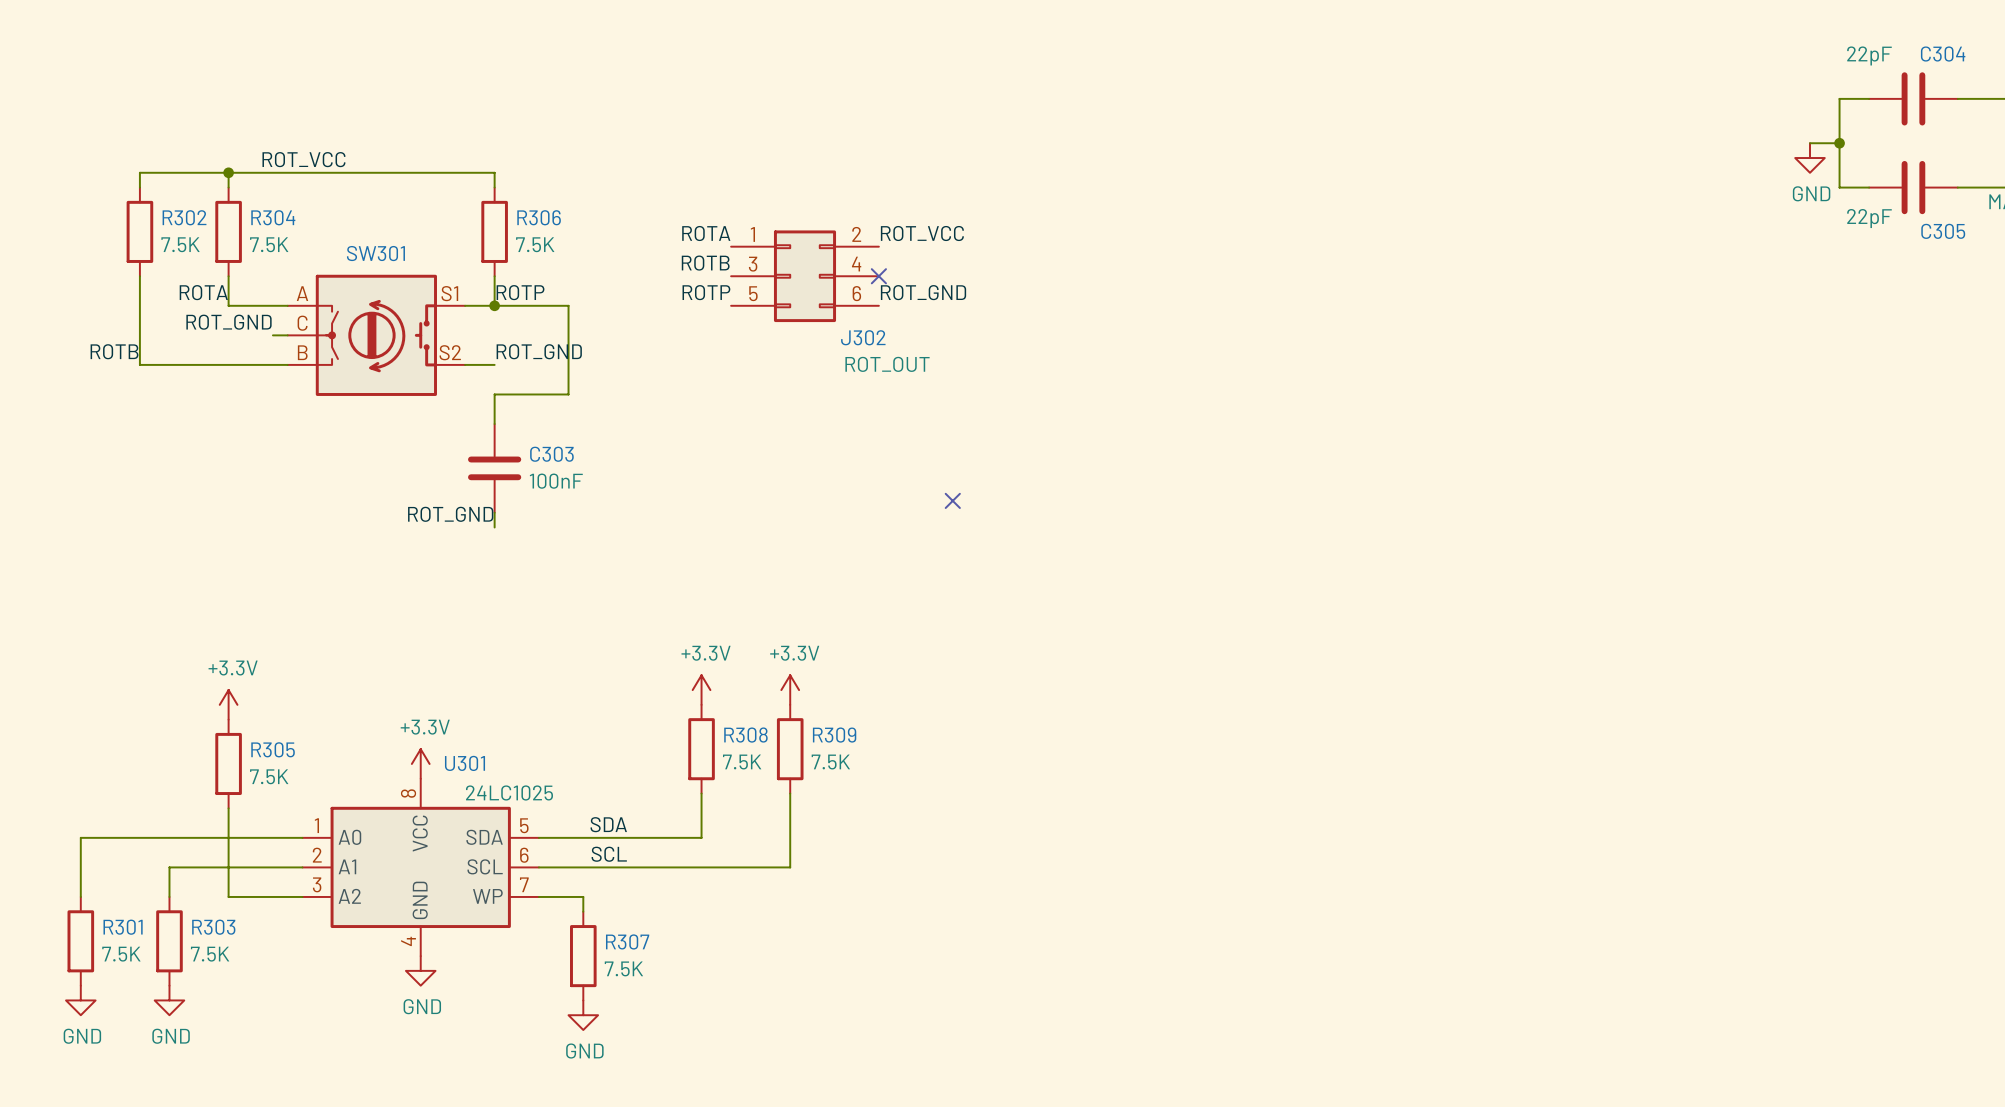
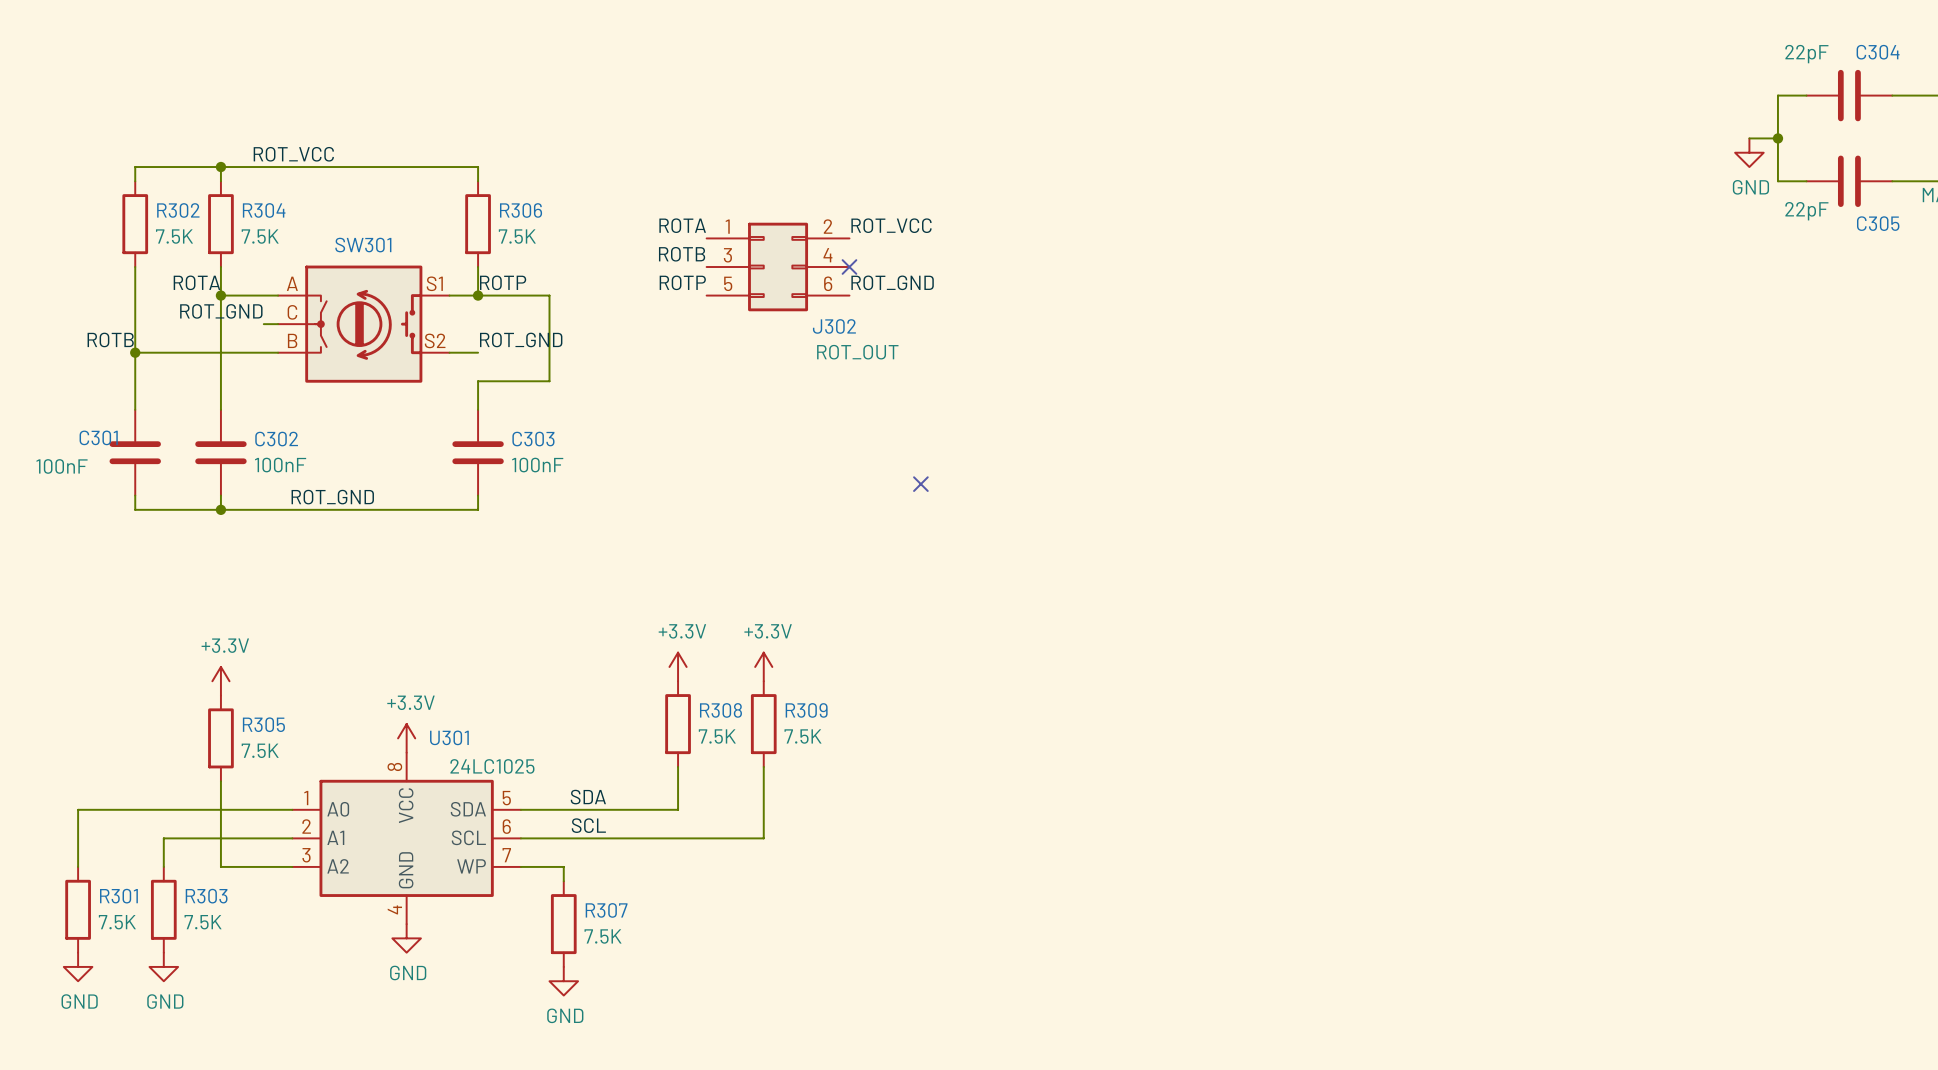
wire: none -> (220, 295) (220, 409)
junction: none -> (220, 295)
wire: none -> (135, 352) (135, 409)
junction: none -> (135, 352)
C301: none -> 100nF (135, 452)
C302: none -> 100nF (220, 452)
wire: none -> (135, 495) (135, 509) (478, 509)
wire: none -> (220, 495) (220, 509)
label position: ROT_GND (450, 514) -> ROT_GND (332, 497)
junction: none -> (220, 509)

